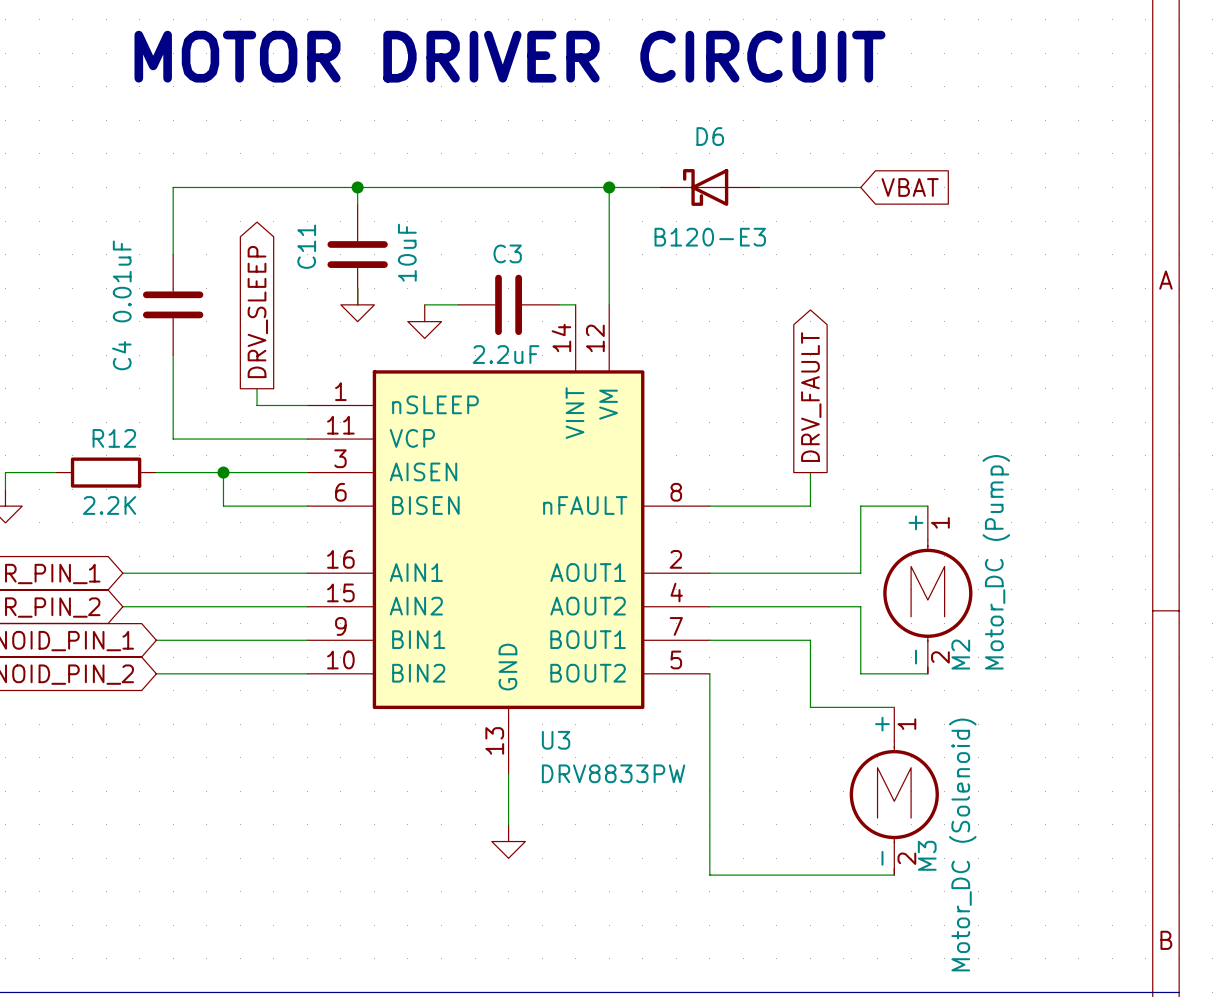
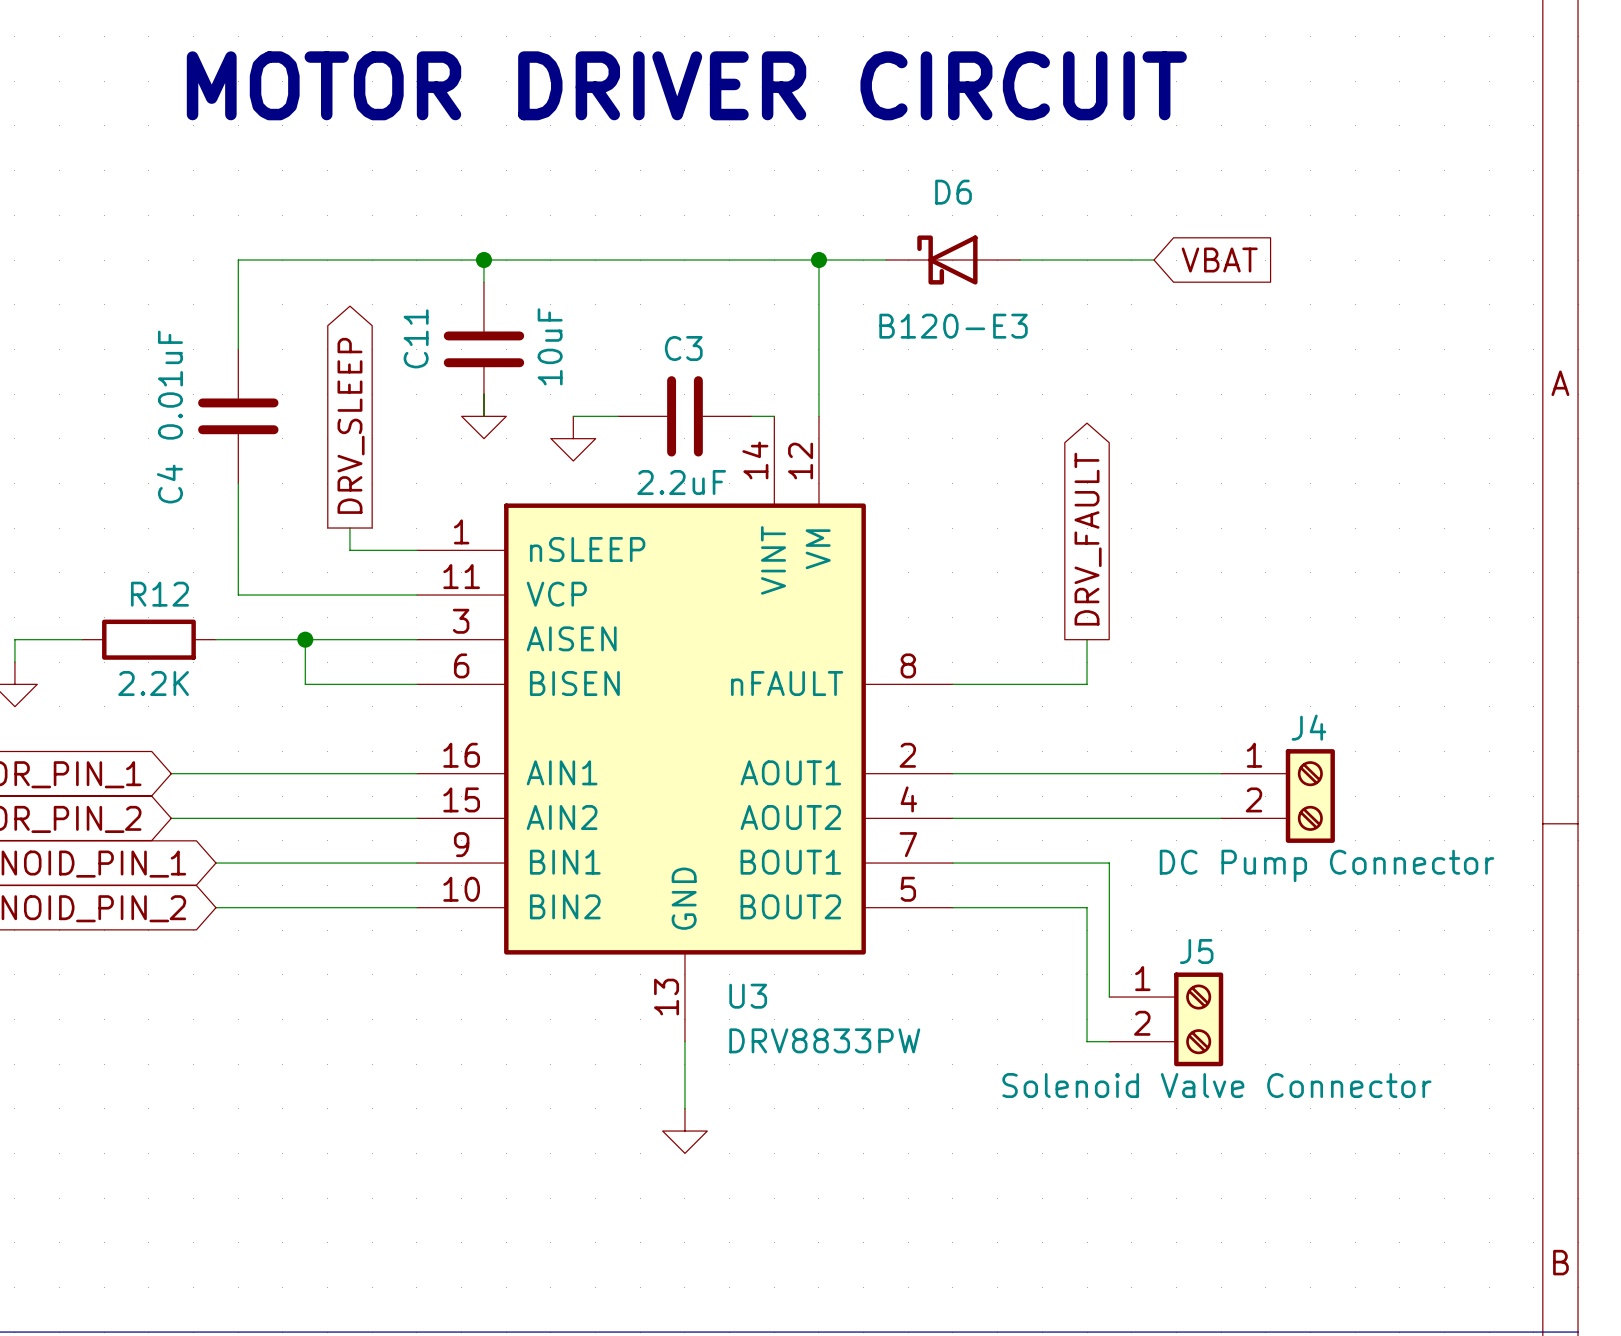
wire: (927, 506) (860, 506) (860, 573) -> (1221, 773) (1154, 773)
M2: Motor_DC (Pump) (927, 589) -> none
J4: none -> DC Pump Connector (1277, 796)
wire: (860, 606) (860, 673) (927, 673) -> (1154, 818) (1221, 818)
wire: (810, 640) (810, 673) -> (1087, 863) (1109, 863) (1109, 997)
wire: (709, 673) (709, 875) (894, 875) -> (952, 907) (1087, 907)
wire: (810, 707) (894, 707) -> (1087, 952) (1087, 1041) (1109, 1041)
J5: none -> Solenoid Valve Connector (1166, 1019)
M3: Motor_DC (Solenoid) (894, 791) -> none

